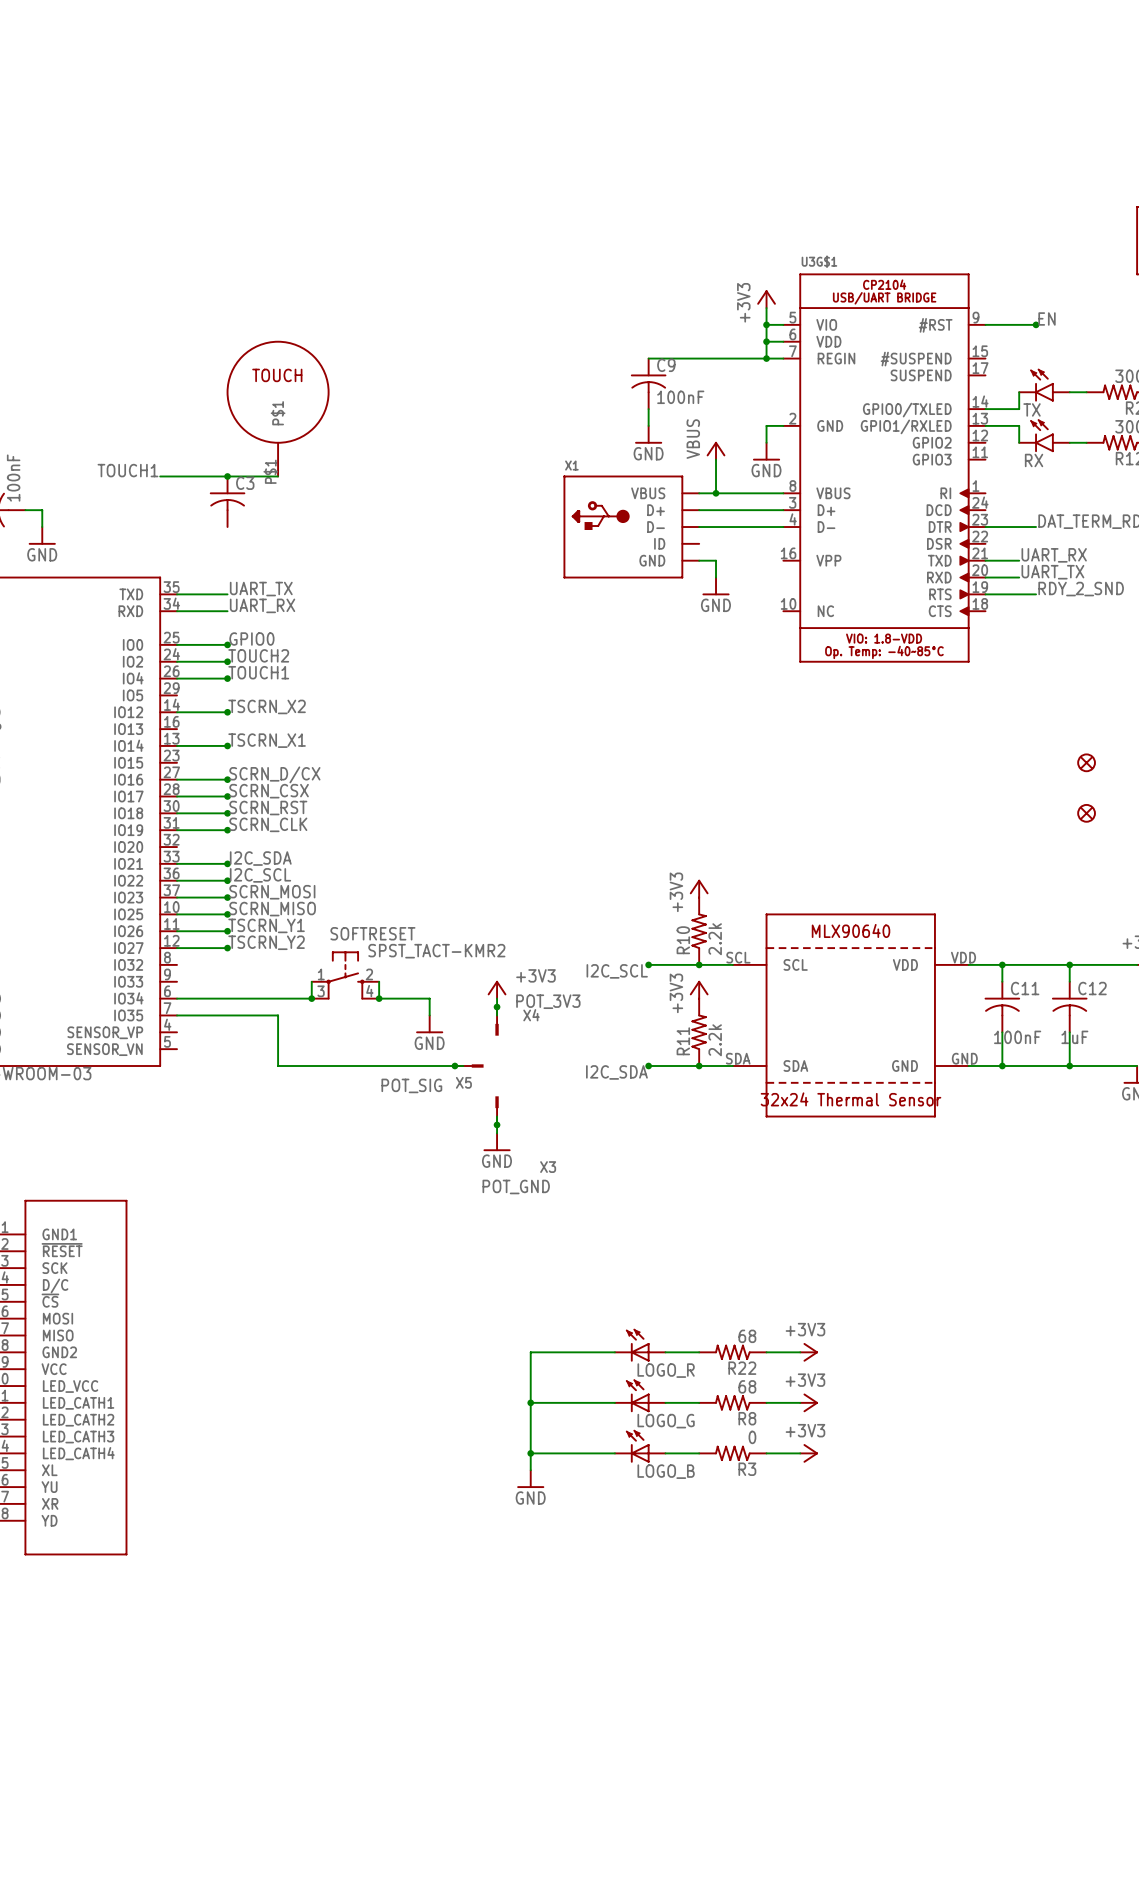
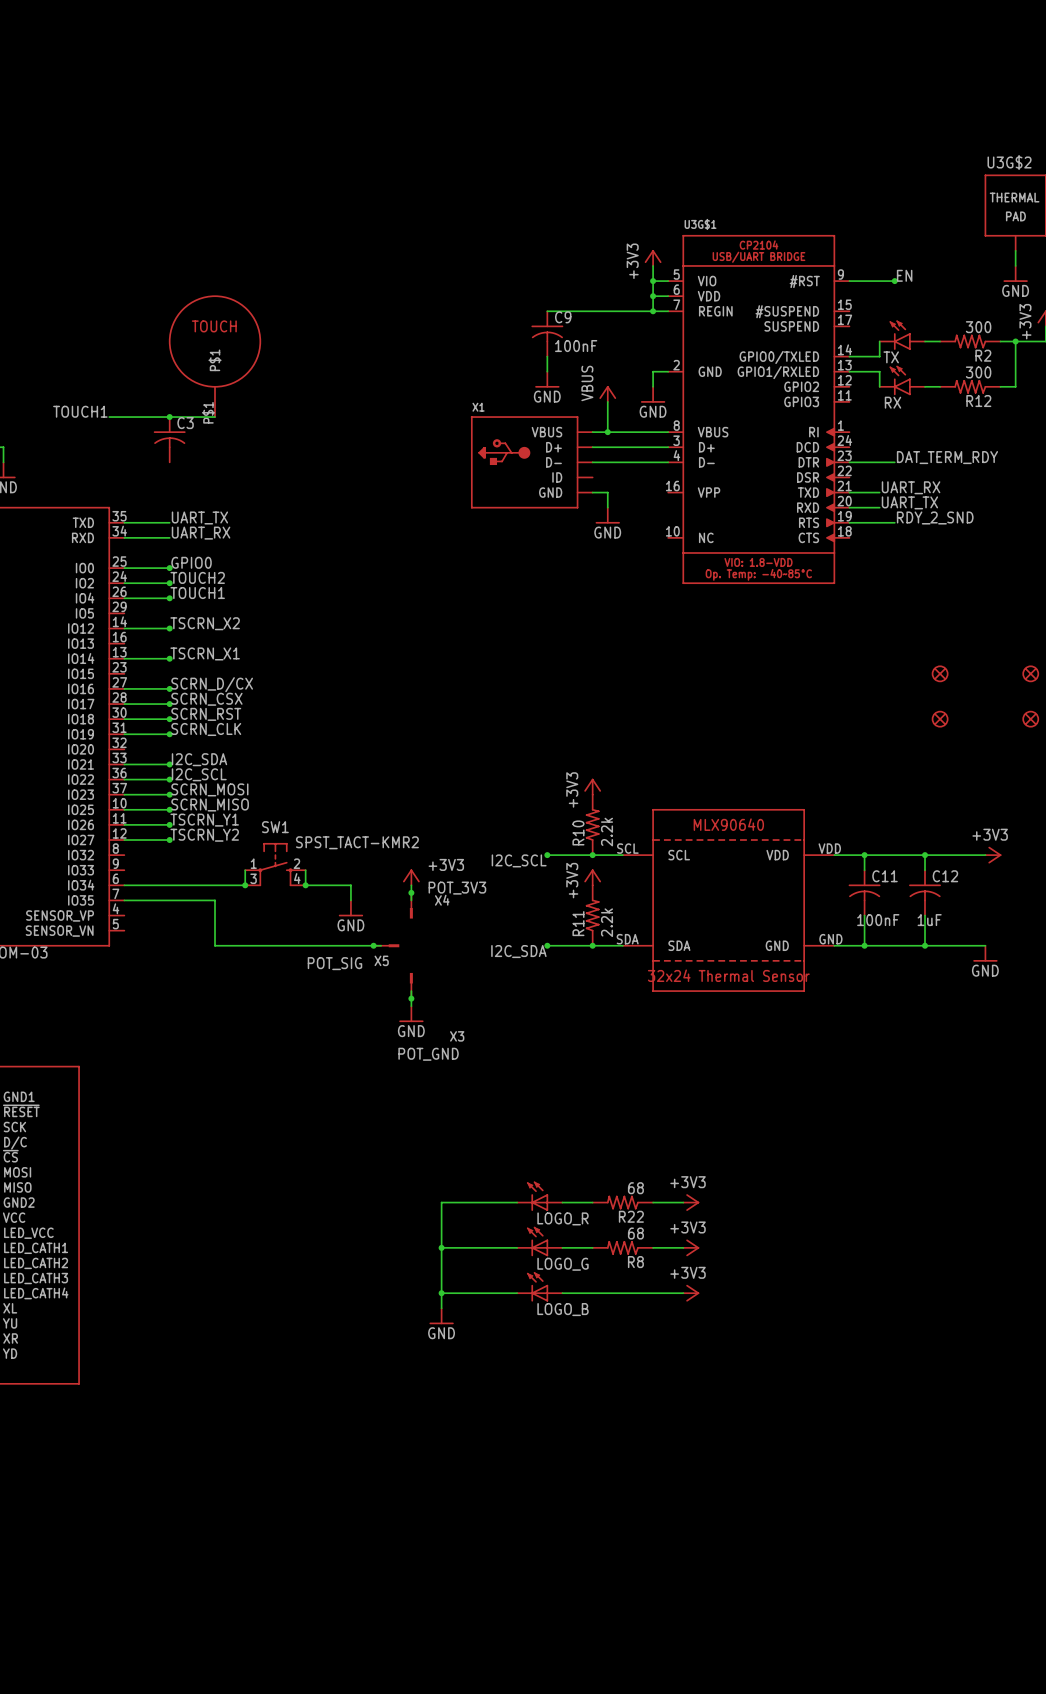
SOFTRESET name: SOFTRESET (372, 933) -> SW1 (275, 827)
R3: 0 (732, 1453) -> none

